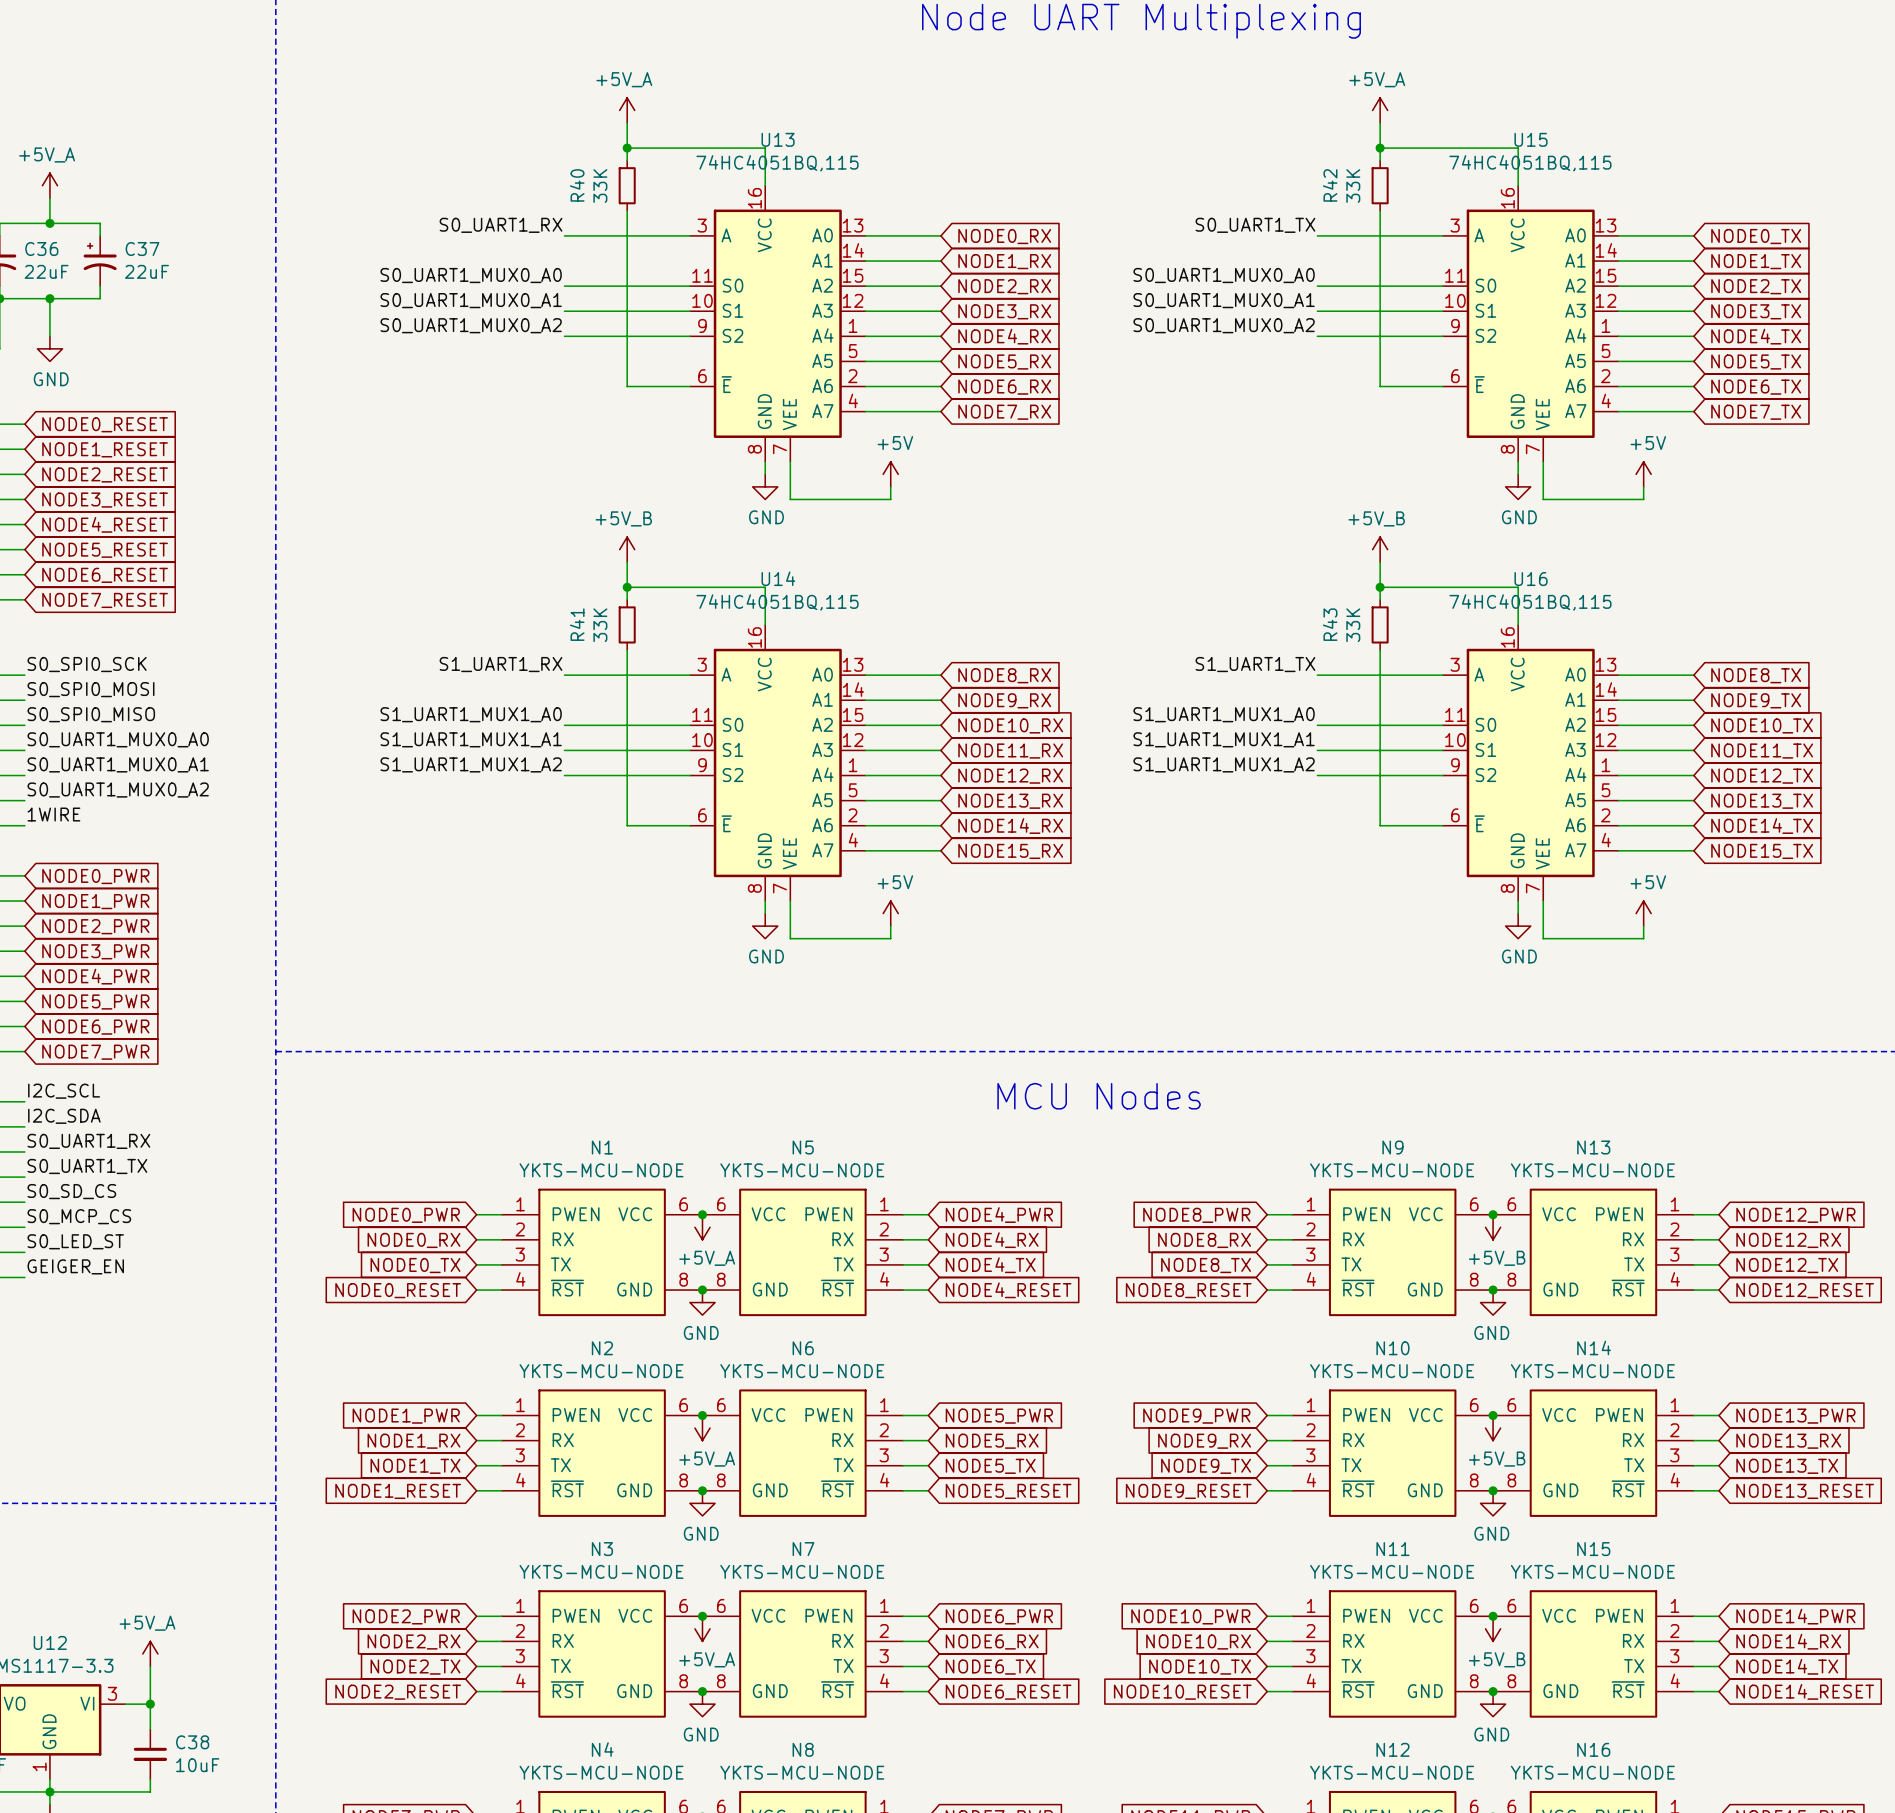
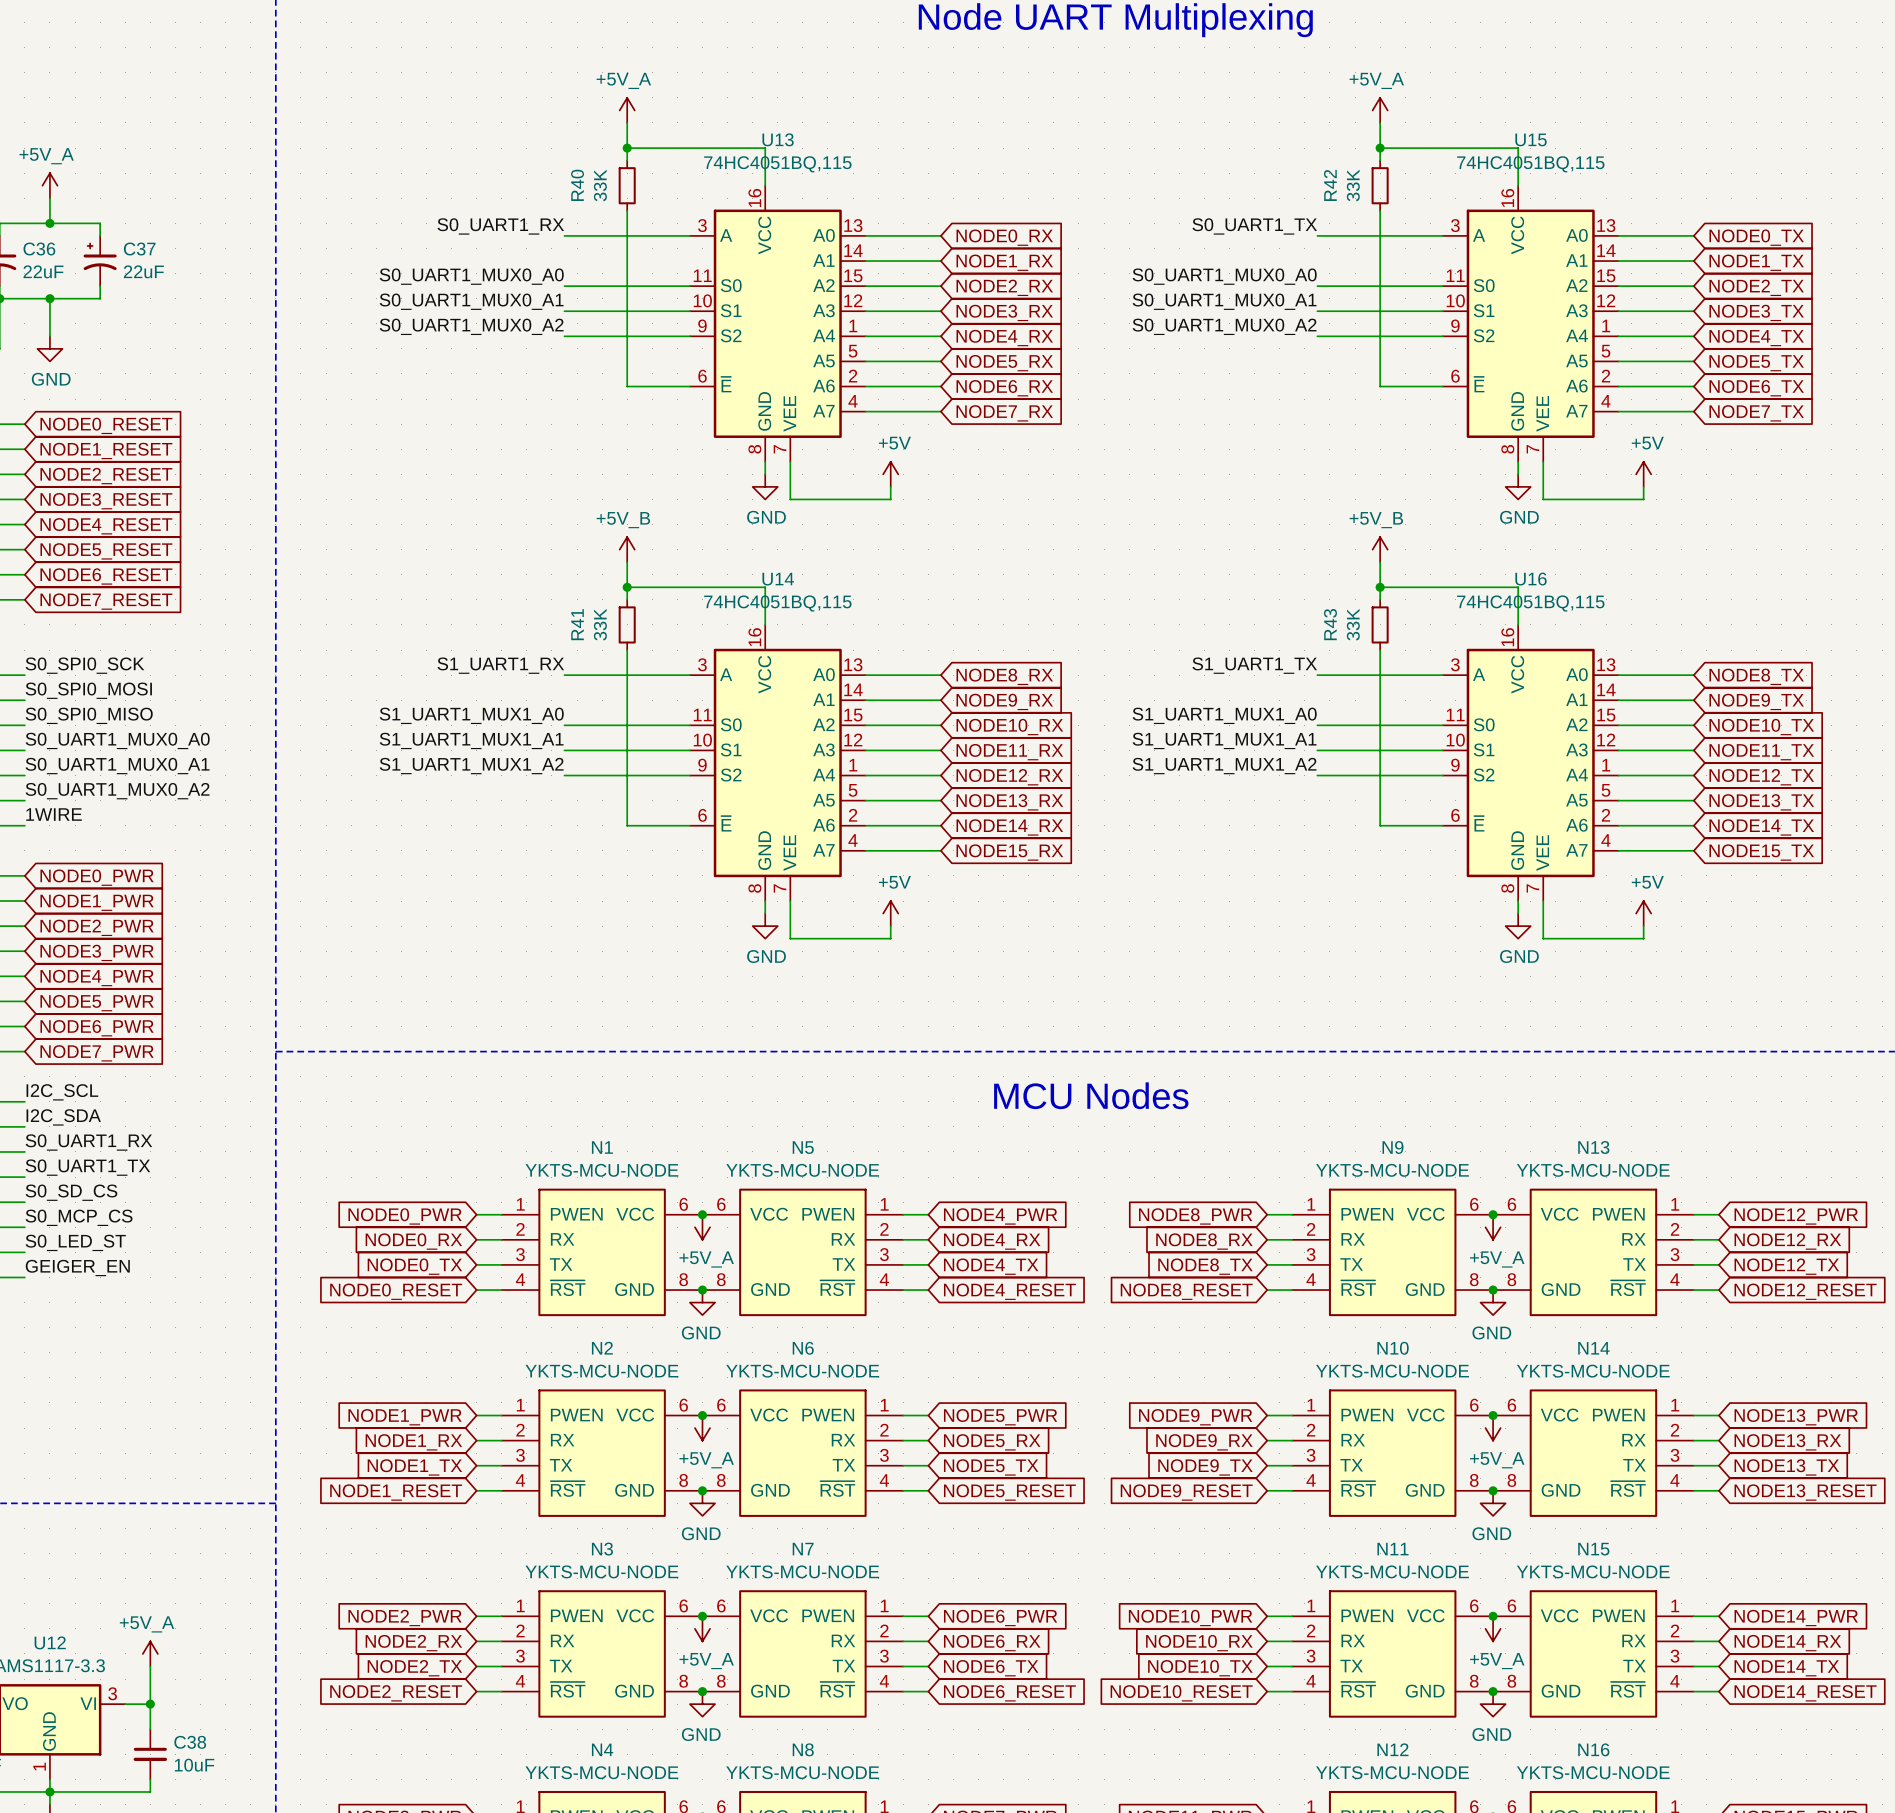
power symbol: +5V_B (1493, 1227) -> +5V_A (1493, 1227)
power symbol: +5V_B (1493, 1428) -> +5V_A (1493, 1428)
power symbol: +5V_B (1493, 1628) -> +5V_A (1493, 1628)

